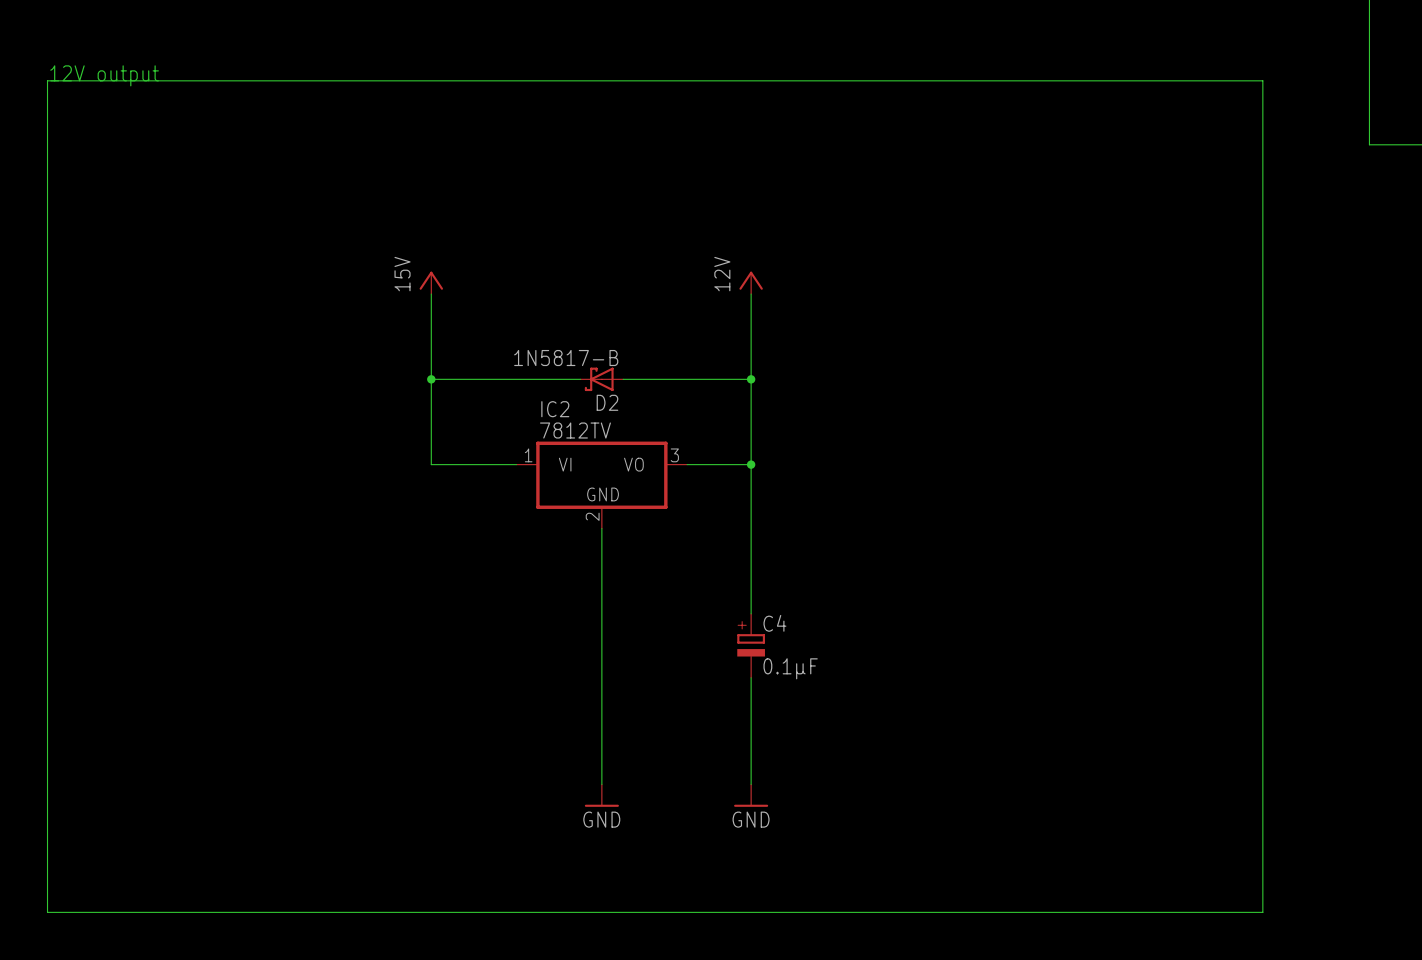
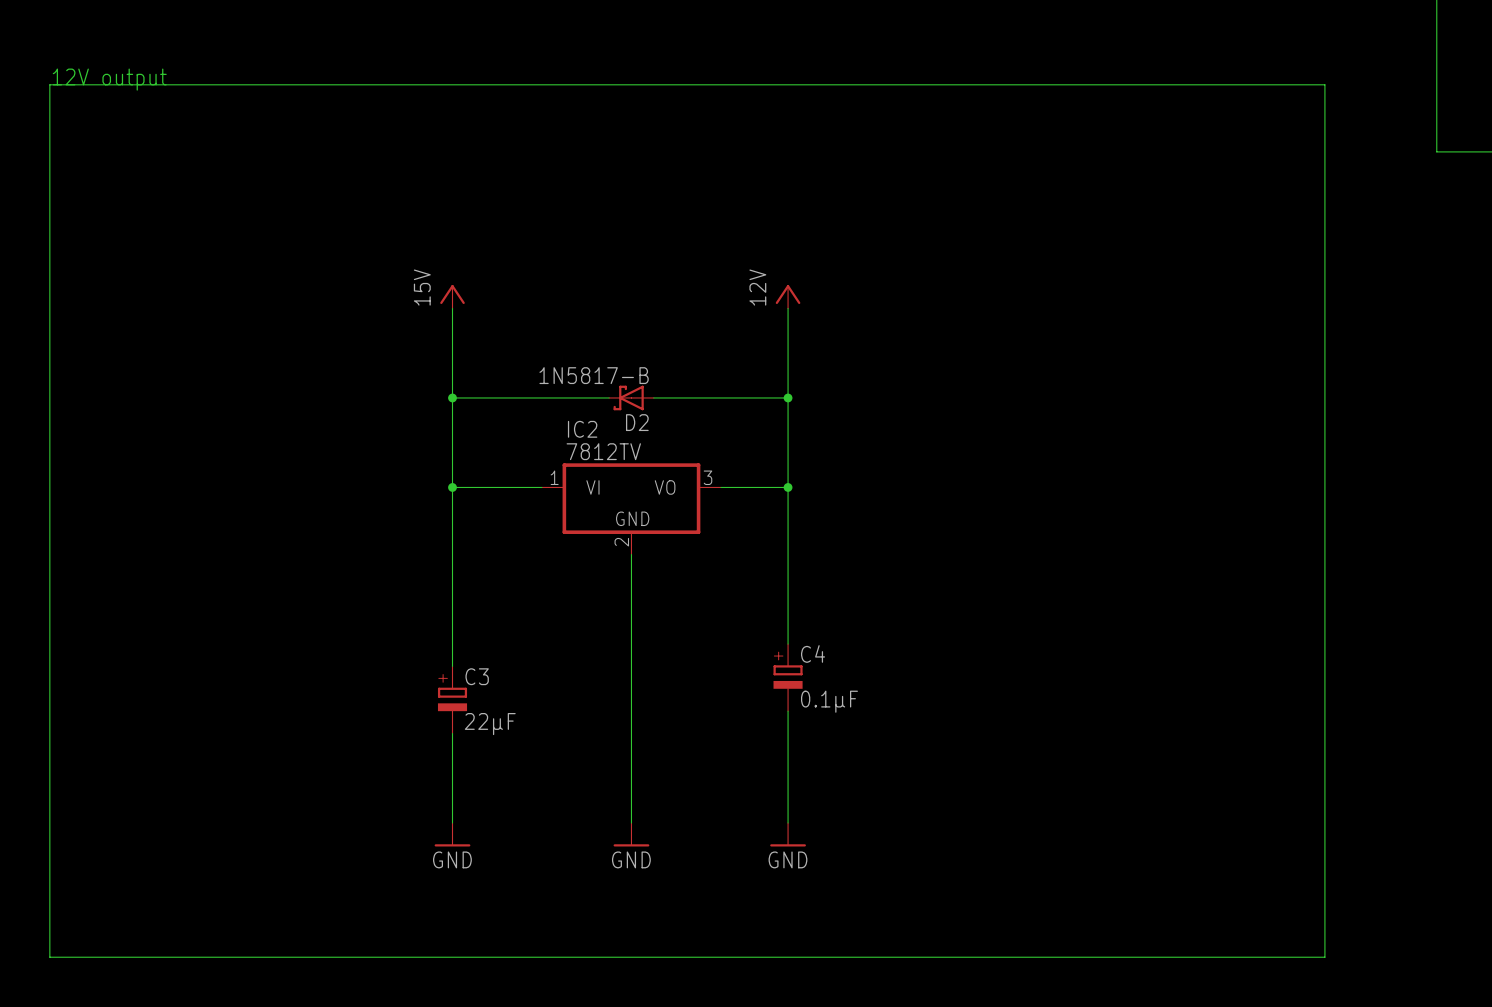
wire: none -> (452, 487) (452, 666)
junction: none -> (452, 487)
C3: none -> 22µF (452, 699)
wire: none -> (452, 733) (452, 823)
power symbol: none -> GND (452, 834)

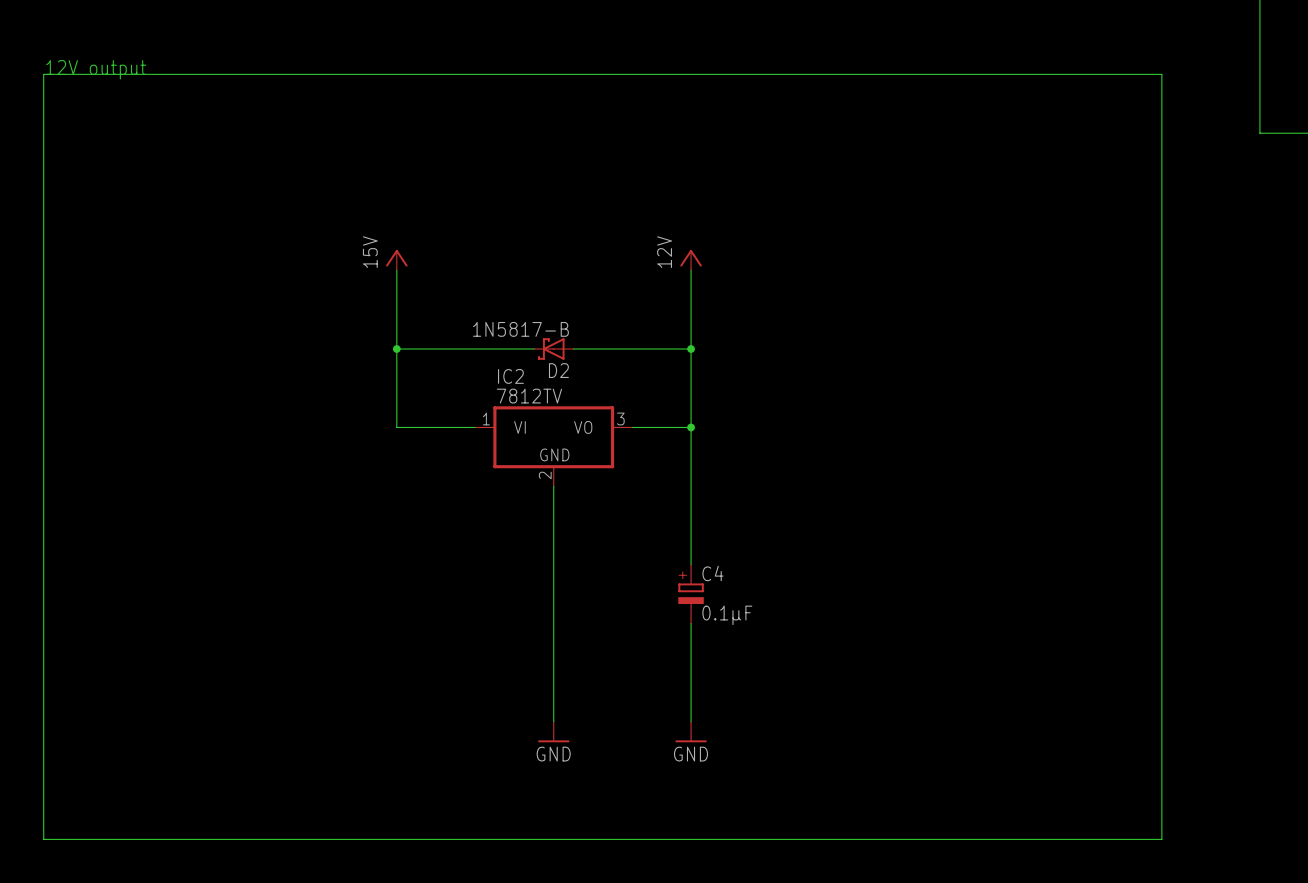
wire: (452, 487) (452, 666) -> none
junction: (452, 487) -> none
C3: 22µF (452, 699) -> none
wire: (452, 733) (452, 823) -> none
power symbol: GND (452, 834) -> none

